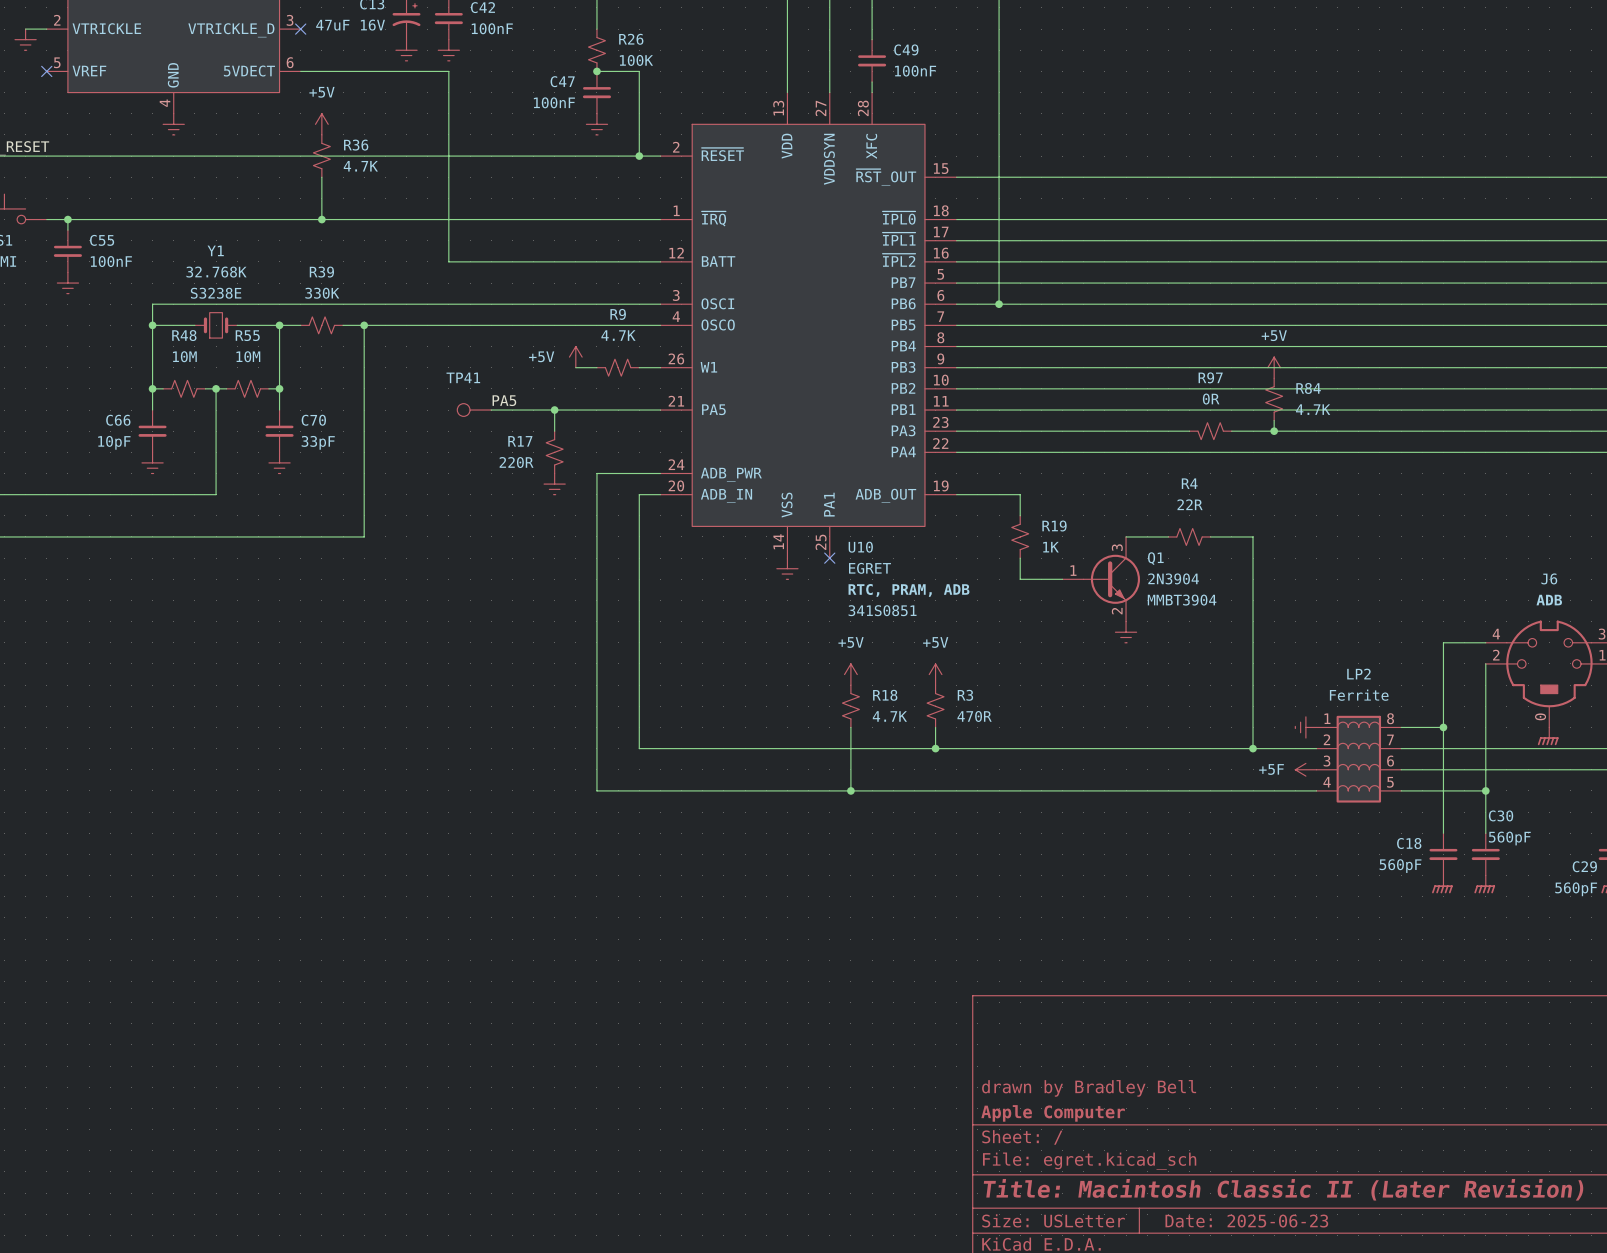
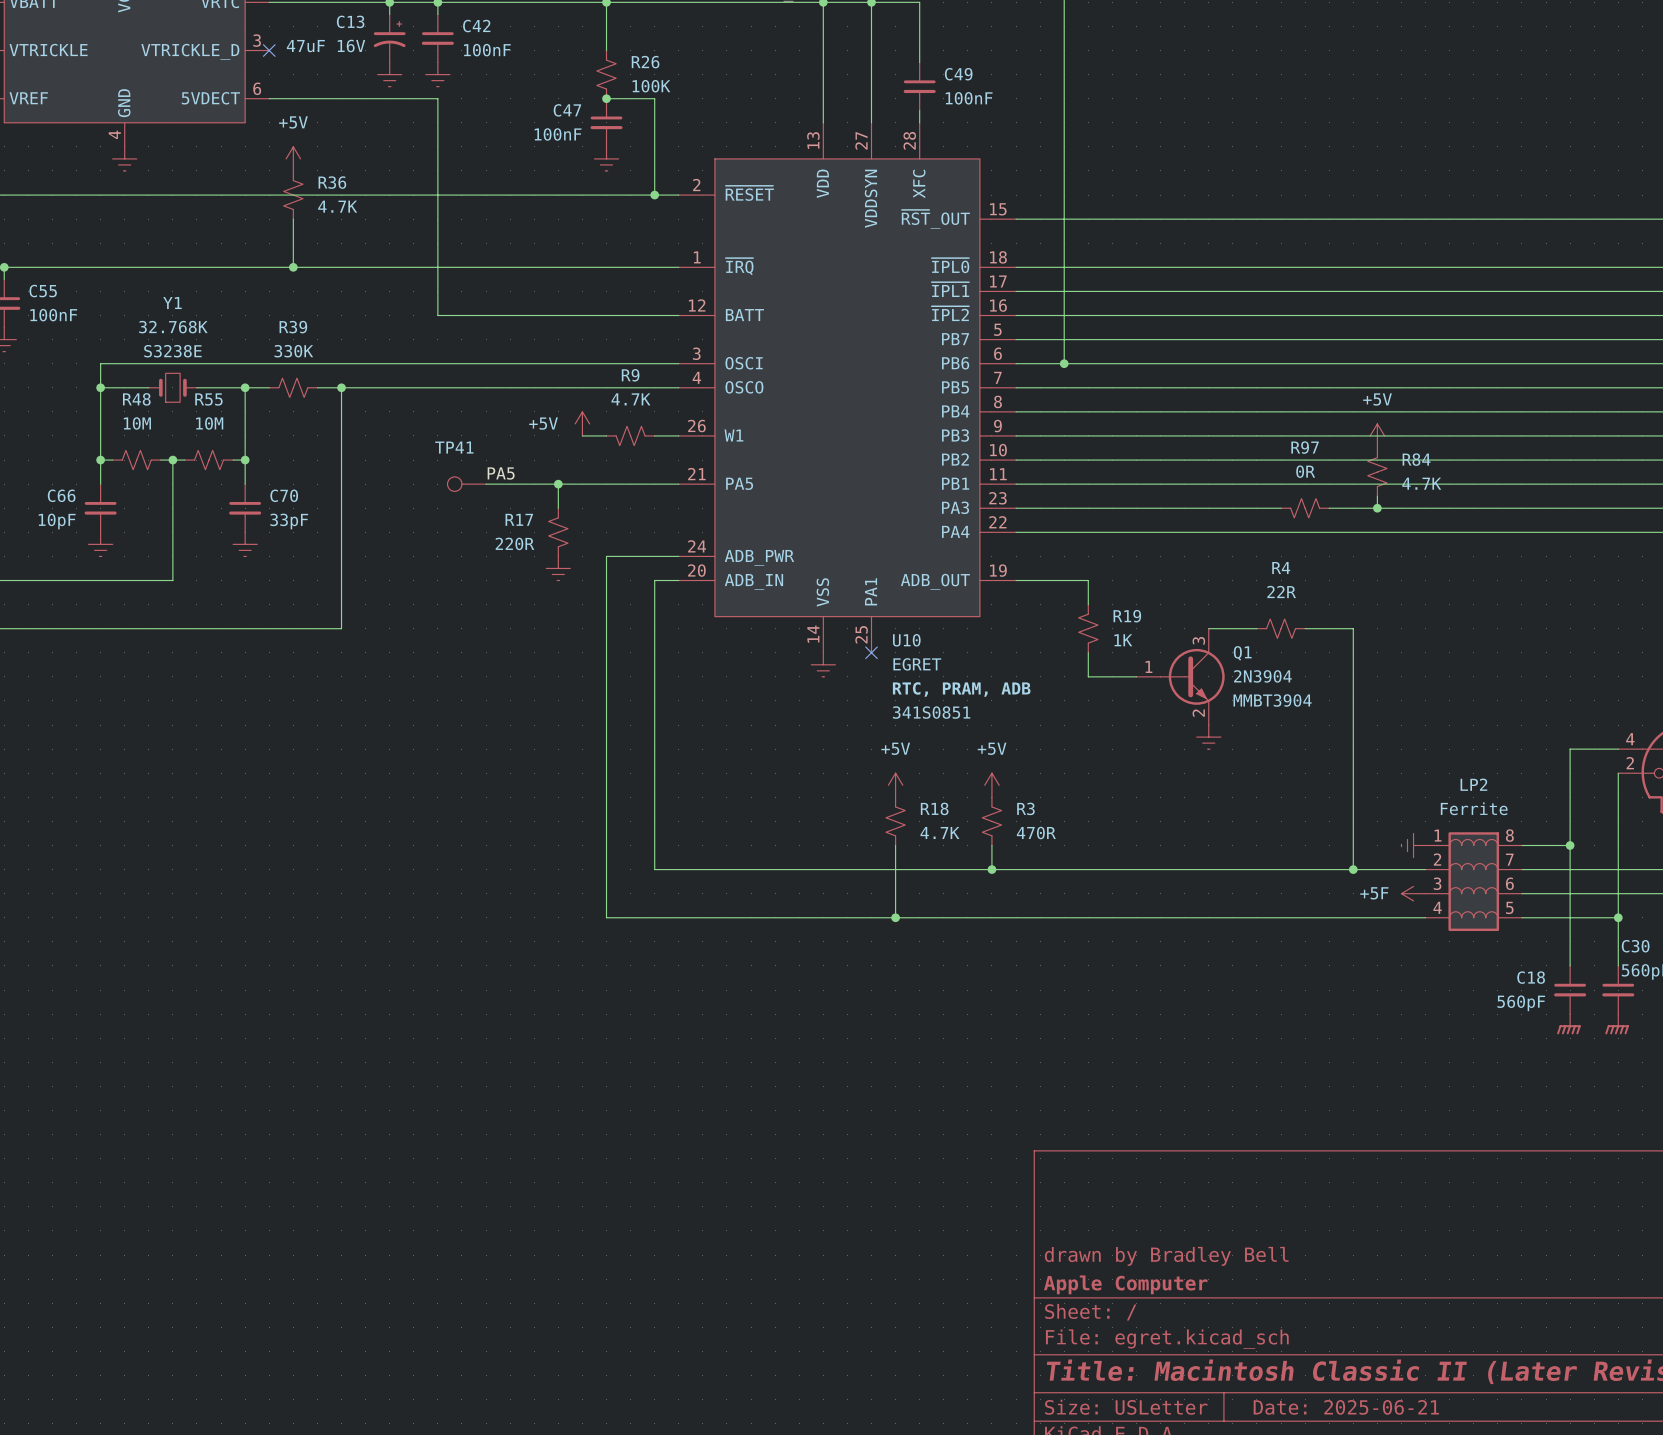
title block: Date: 2025-06-23 (1246, 1221) -> Date: 2025-06-21 (1346, 1407)

